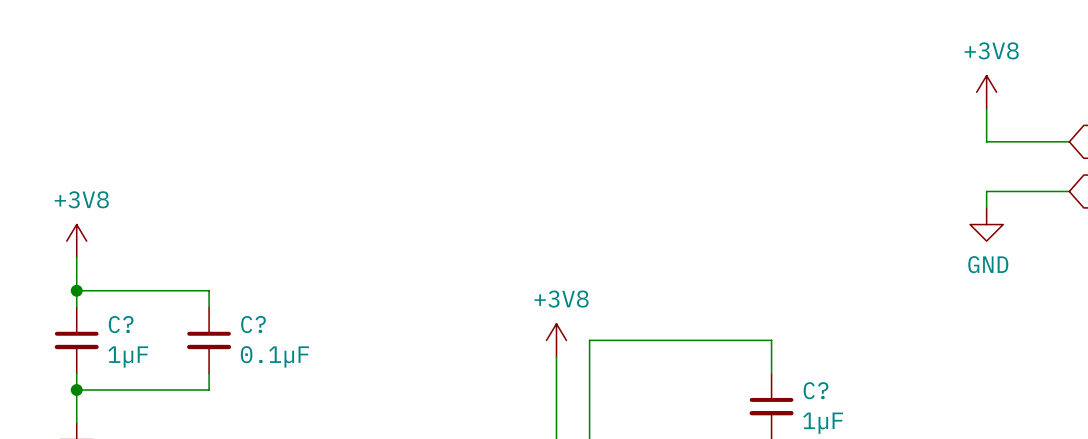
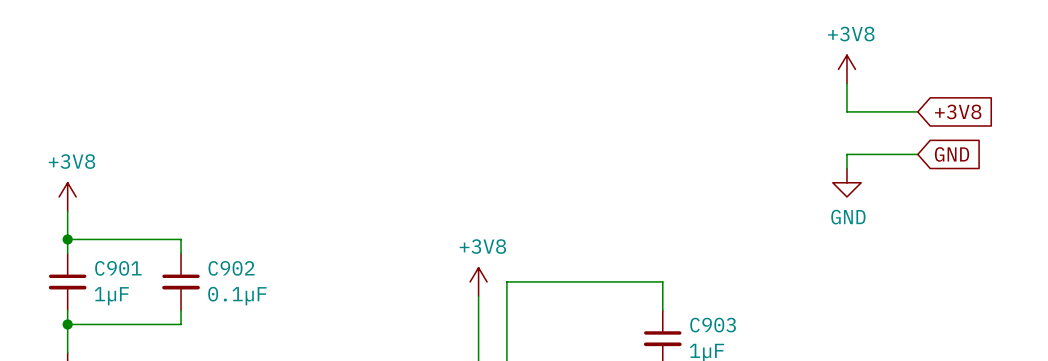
C? name: C? (121, 324) -> C901 (118, 268)
C? name: C? (253, 324) -> C902 (231, 268)
C? name: C? (815, 390) -> C903 (713, 325)

